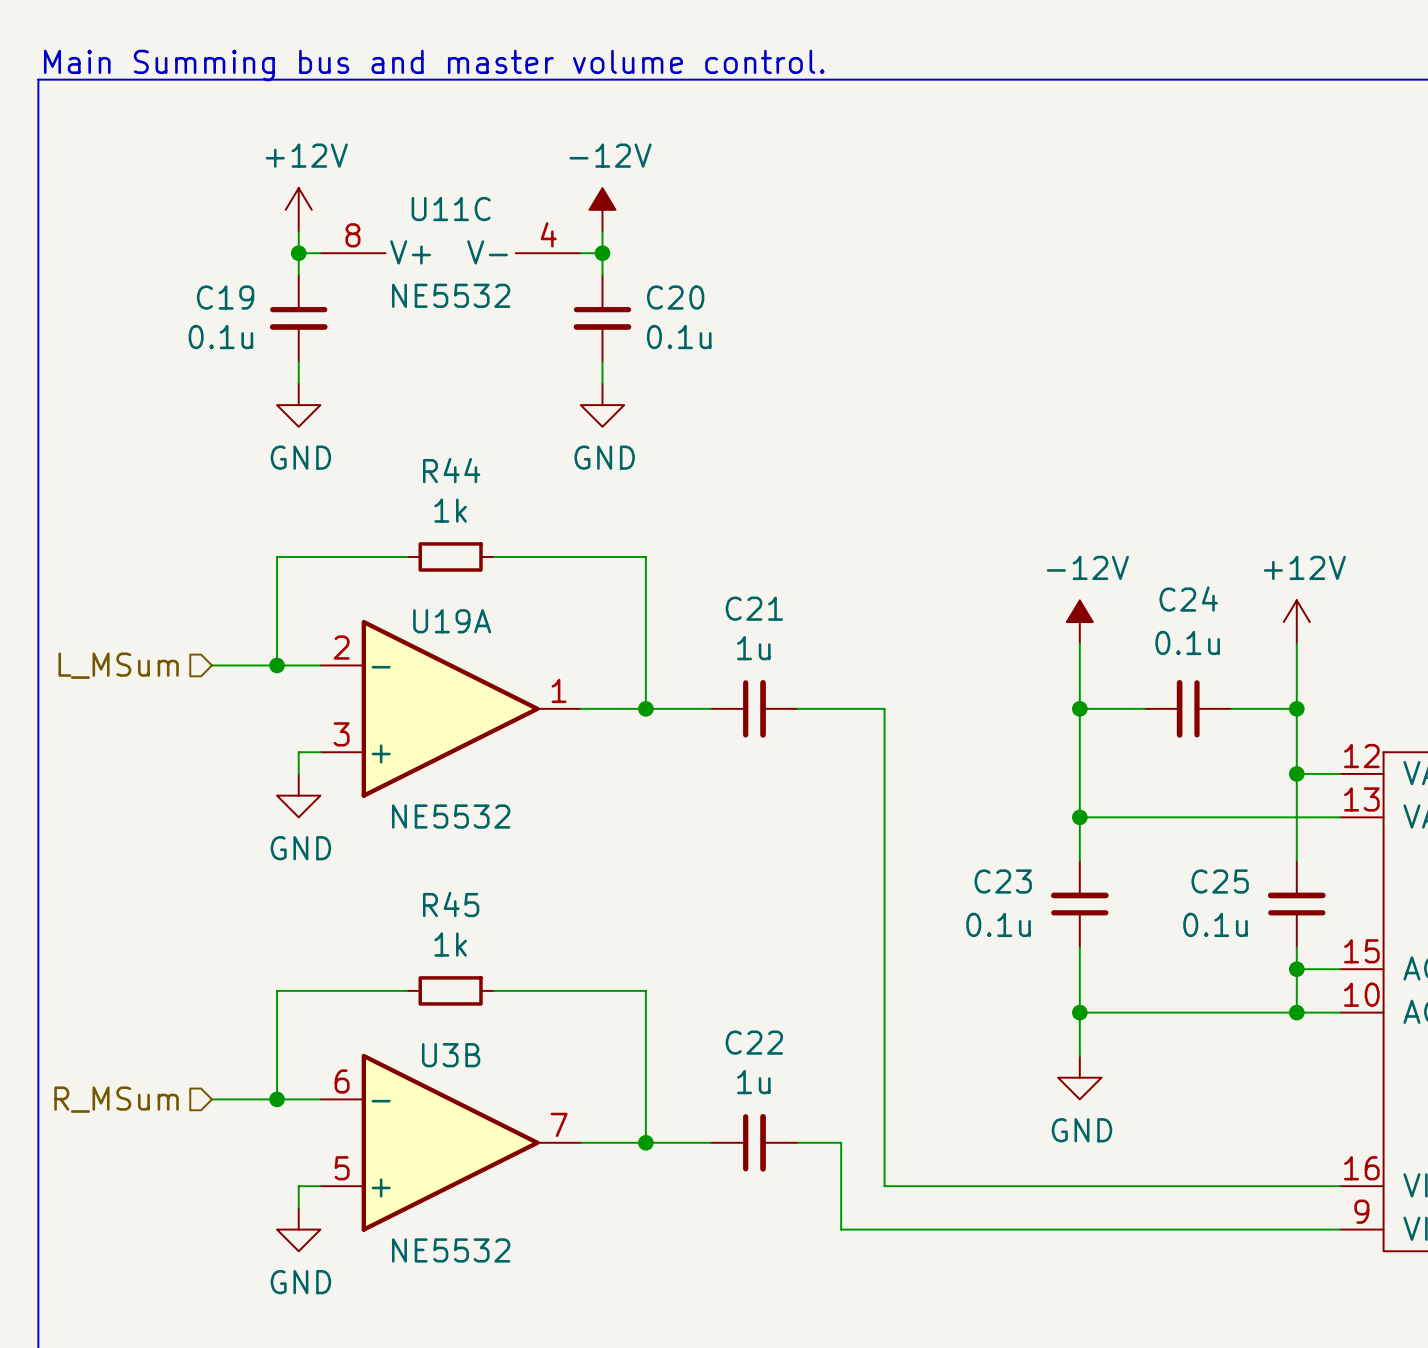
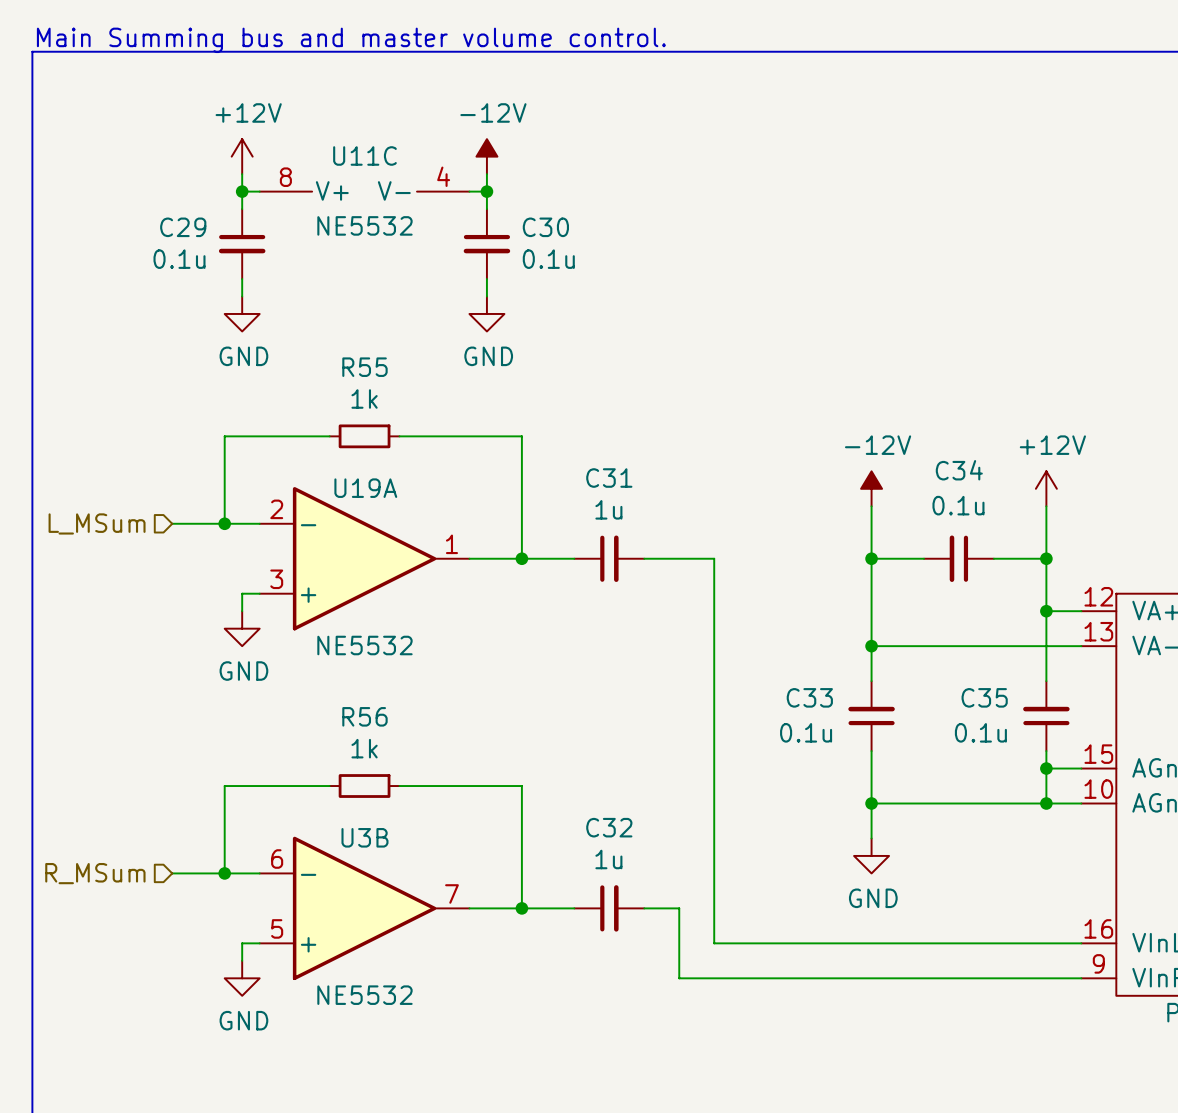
C19 name: C19 (225, 297) -> C29 (183, 227)
C20 name: C20 (675, 297) -> C30 (545, 227)
R44 name: R44 (451, 470) -> R55 (364, 367)
C24 name: C24 (1188, 599) -> C34 (959, 470)
C21 name: C21 (754, 608) -> C31 (609, 478)
C23 name: C23 (1003, 881) -> C33 (809, 697)
C25 name: C25 (1220, 881) -> C35 (984, 697)
R45 name: R45 (451, 904) -> R56 (364, 716)
C22 name: C22 (754, 1042) -> C32 (609, 827)

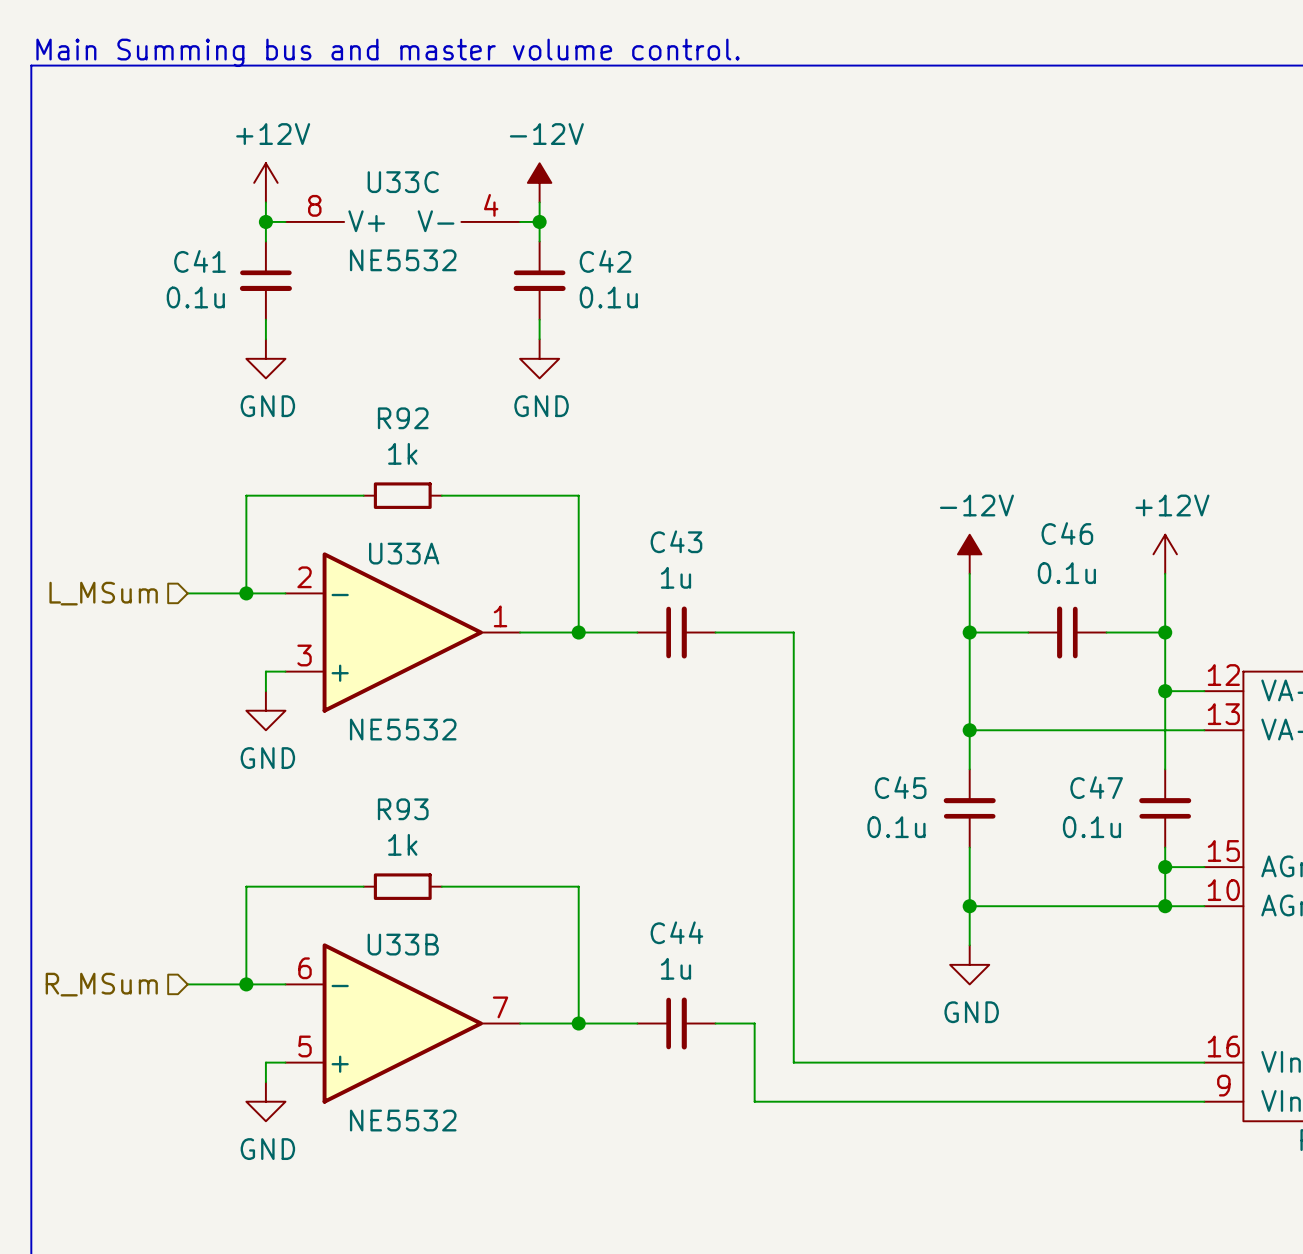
U11C name: U11C (364, 155) -> U33C (403, 182)
C29 name: C29 (183, 227) -> C41 (200, 261)
C30 name: C30 (545, 227) -> C42 (605, 261)
R55 name: R55 (364, 367) -> R92 (403, 418)
C34 name: C34 (959, 470) -> C46 (1067, 533)
C31 name: C31 (609, 478) -> C43 (676, 541)
U19A name: U19A (365, 488) -> U33A (404, 553)
C33 name: C33 (809, 697) -> C45 (900, 787)
C35 name: C35 (984, 697) -> C47 (1096, 787)
R56 name: R56 (364, 716) -> R93 (403, 809)
C32 name: C32 (609, 827) -> C44 (676, 932)
U3B name: U3B (364, 837) -> U33B (403, 944)

